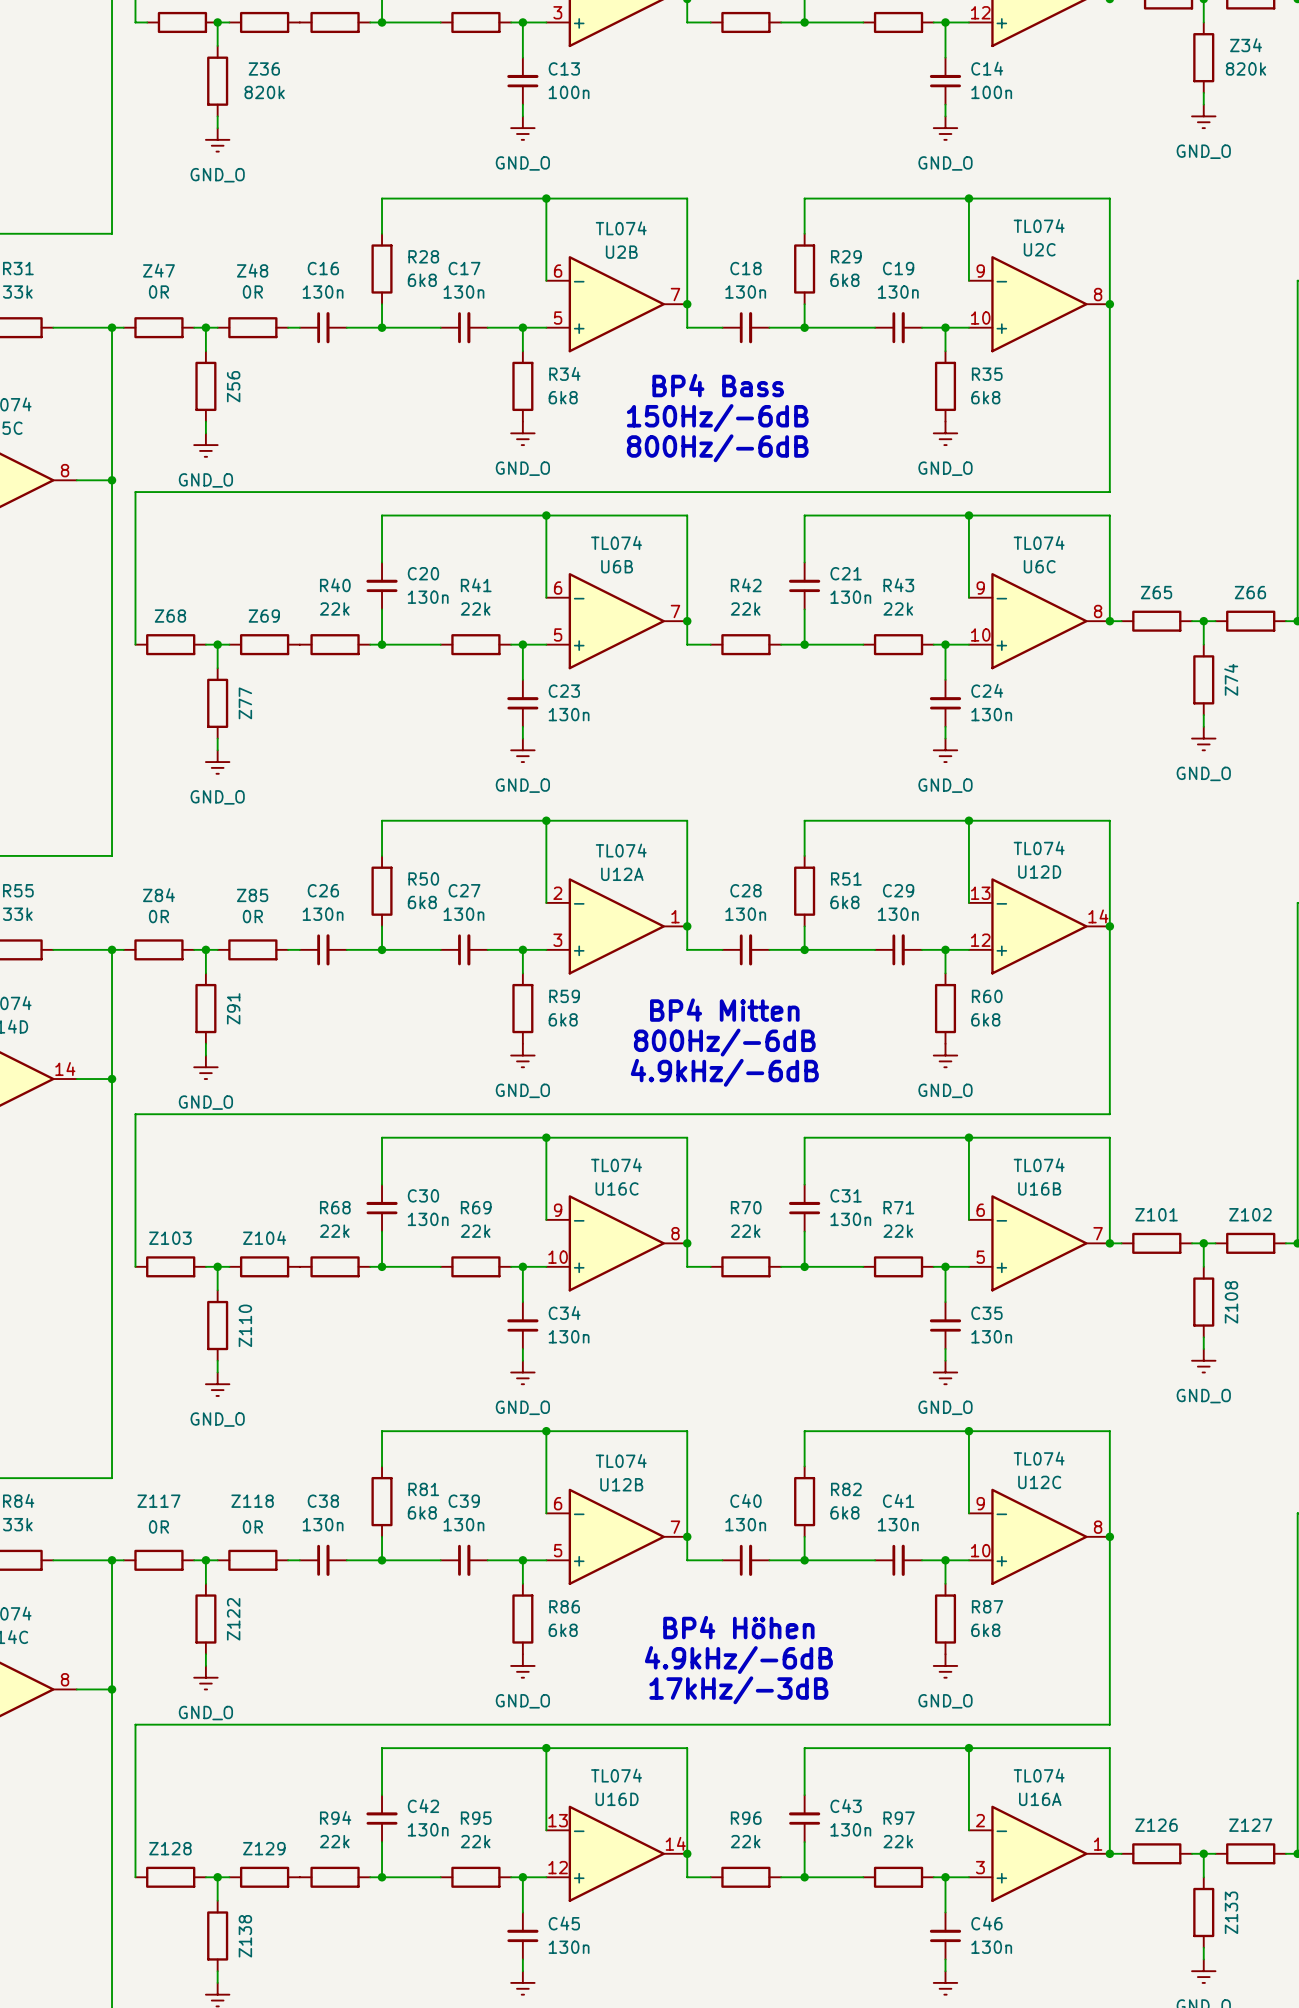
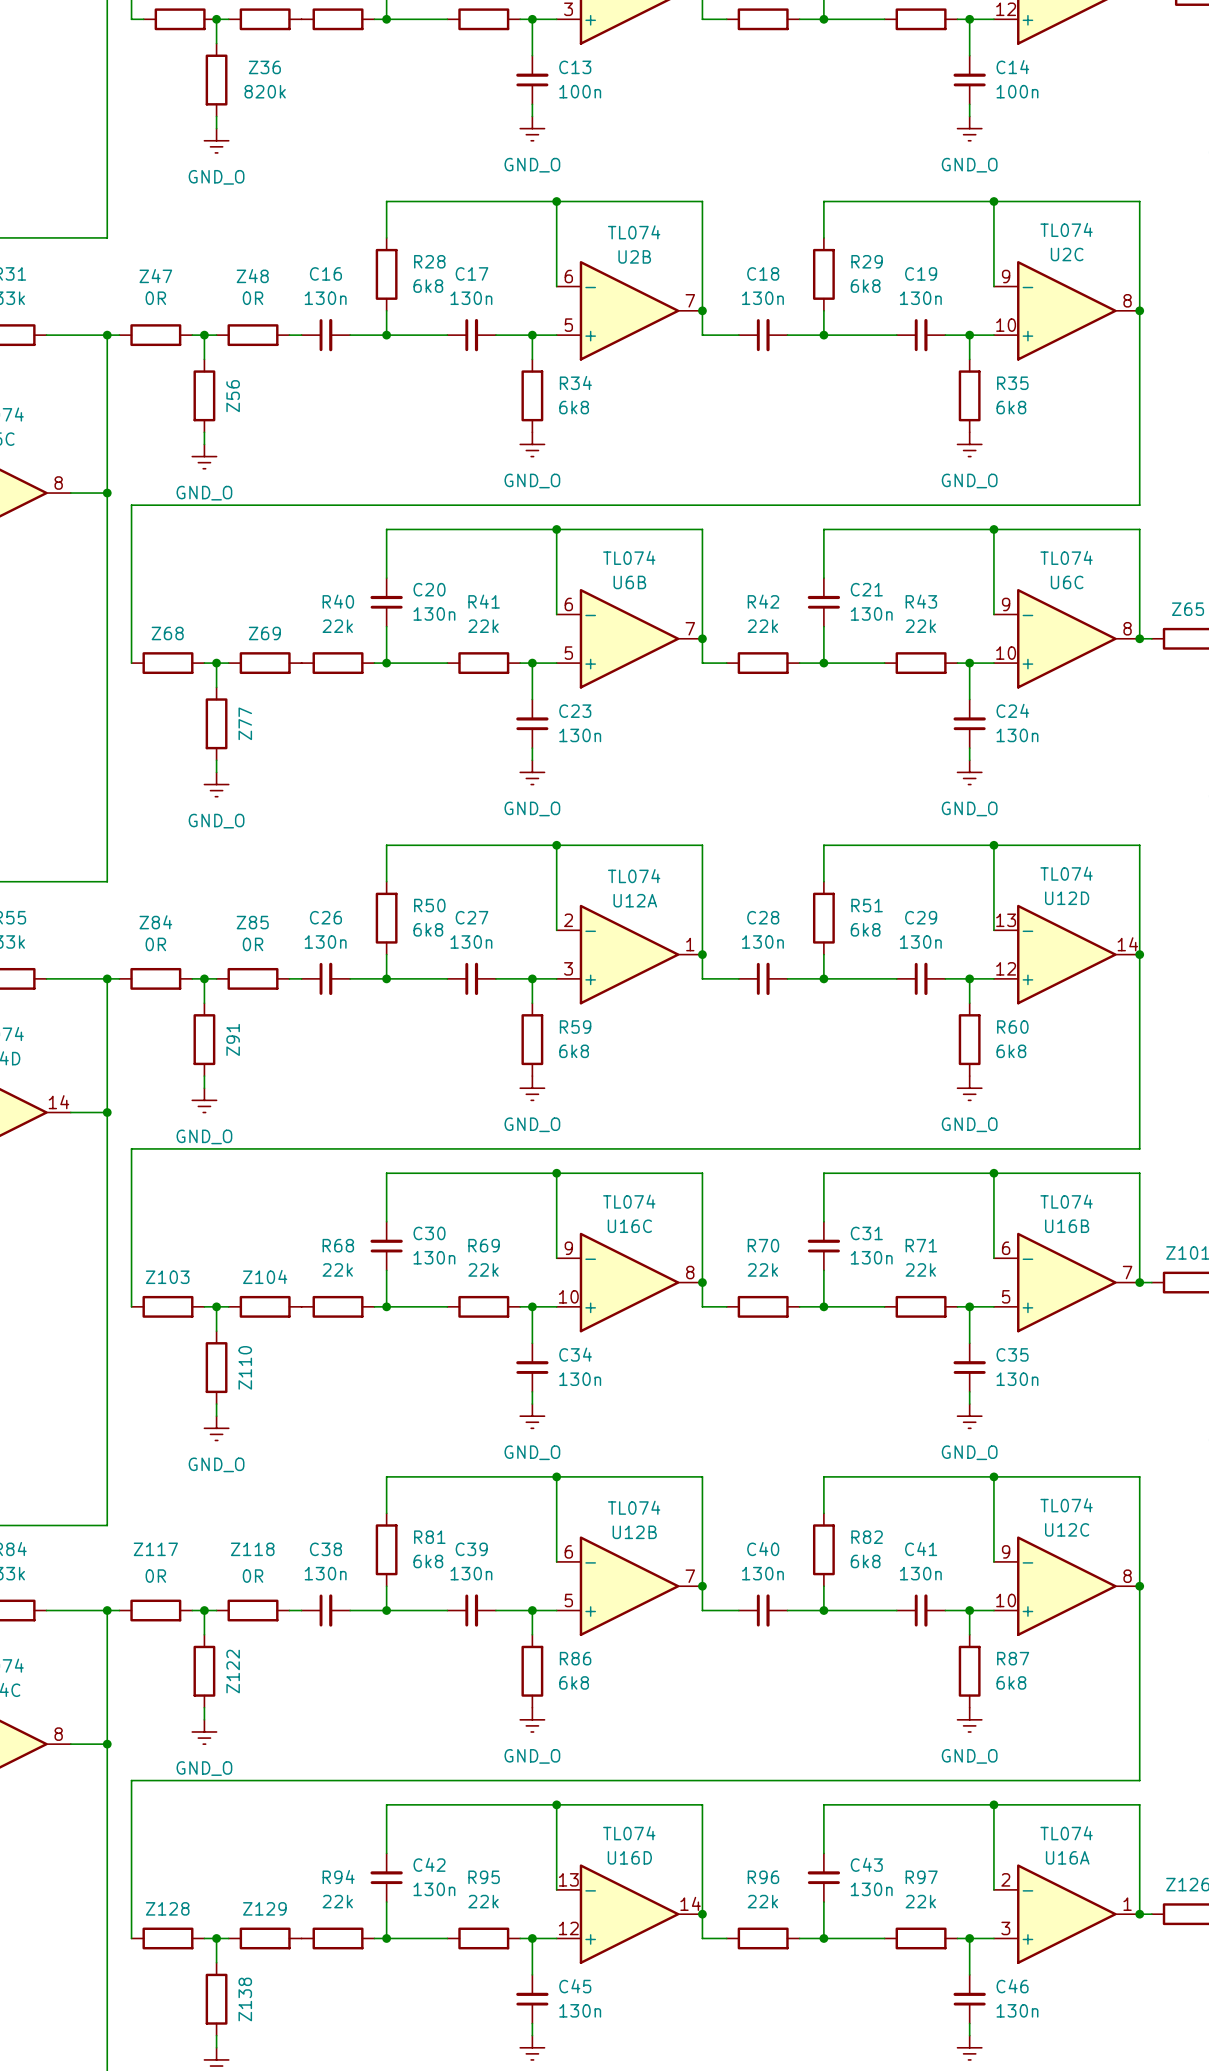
text: BP4 Bass (718, 385) -> none
text: 150Hz/-6dB (717, 418) -> none
text: 800Hz/-6dB (717, 448) -> none
text: BP4 Mitten (724, 1010) -> none
text: 800Hz/-6dB (724, 1042) -> none
text: 4.9kHz/-6dB (724, 1072) -> none
text: BP4 Höhen (738, 1627) -> none
text: 4.9kHz/-6dB (738, 1660) -> none
text: 17kHz/-3dB (738, 1690) -> none

